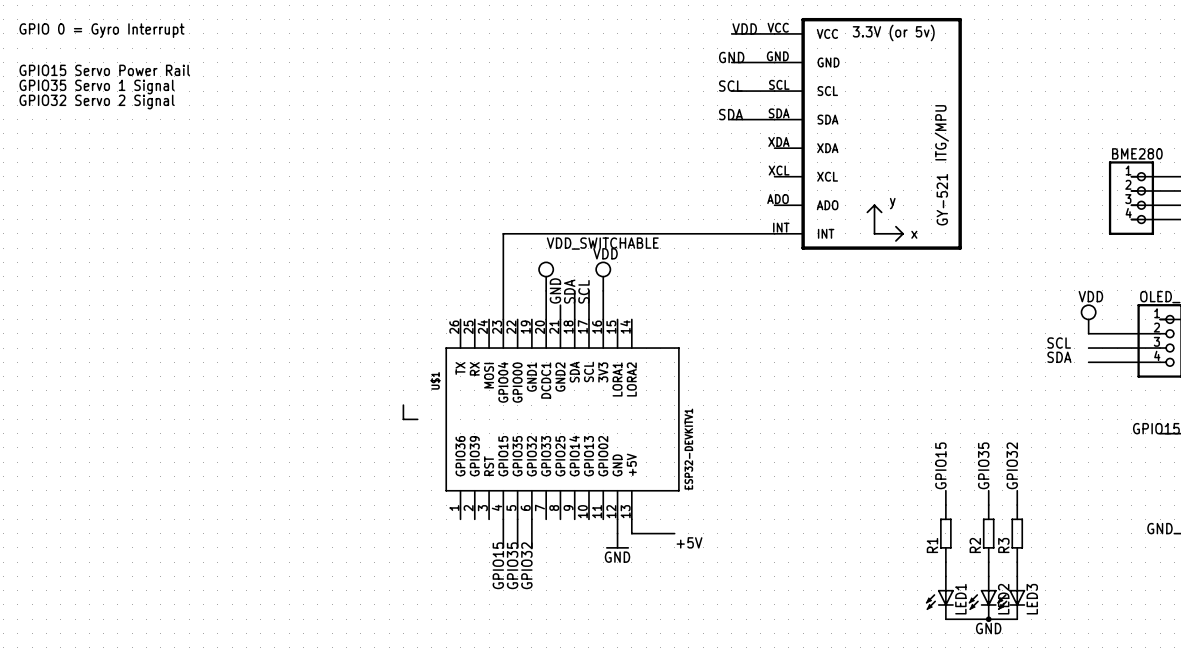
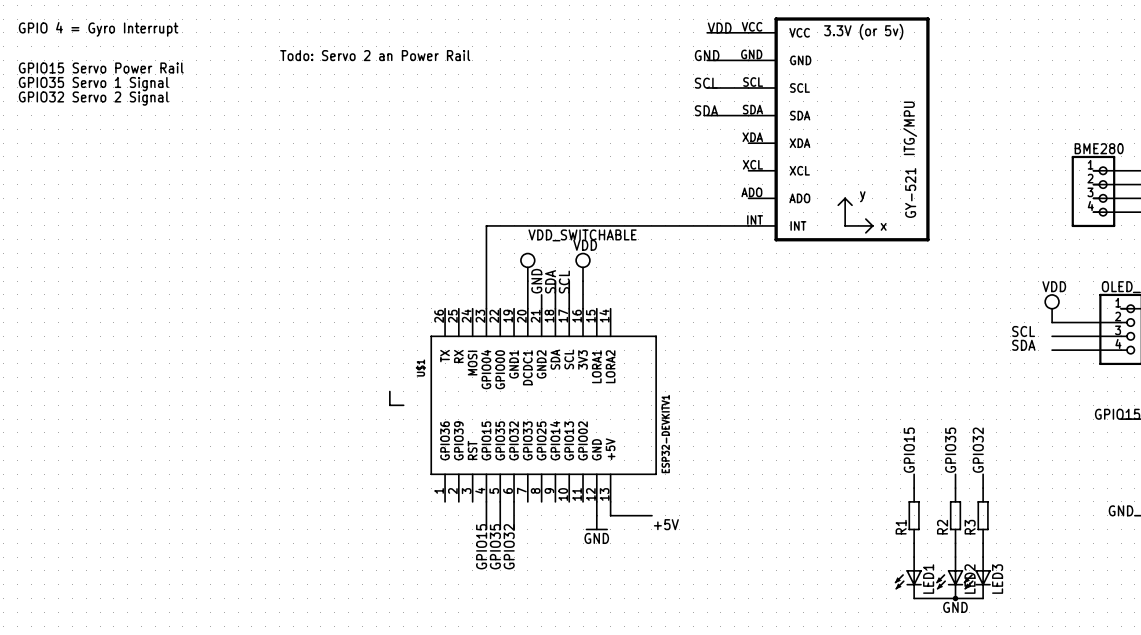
text: GPIO 0 = Gyro Interrupt (102, 30) -> GPIO 4 = Gyro Interrupt (98, 29)
text: none -> Todo: Servo 2 an Power Rail (375, 55)

